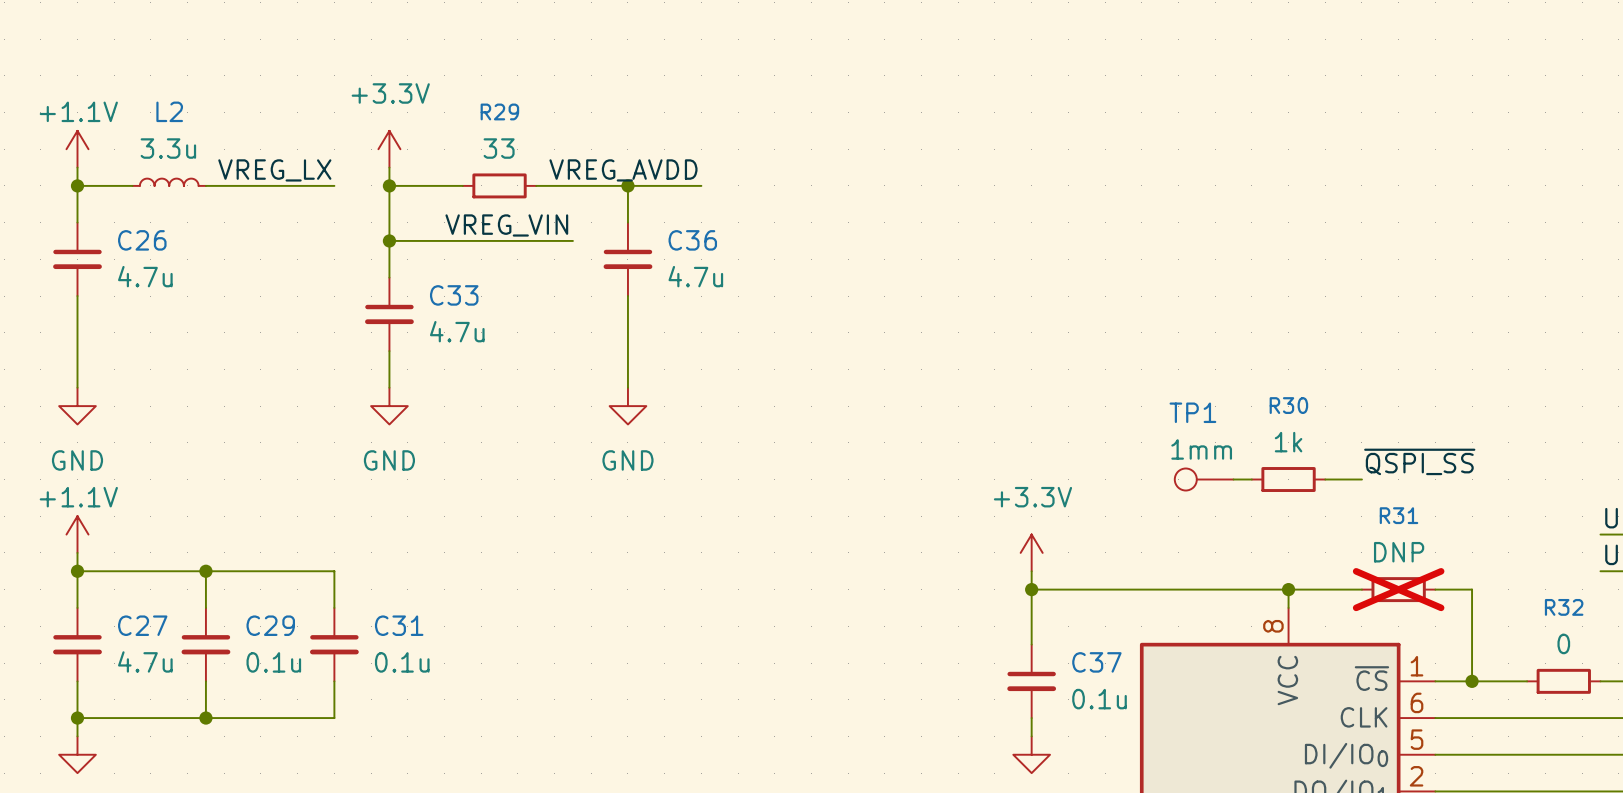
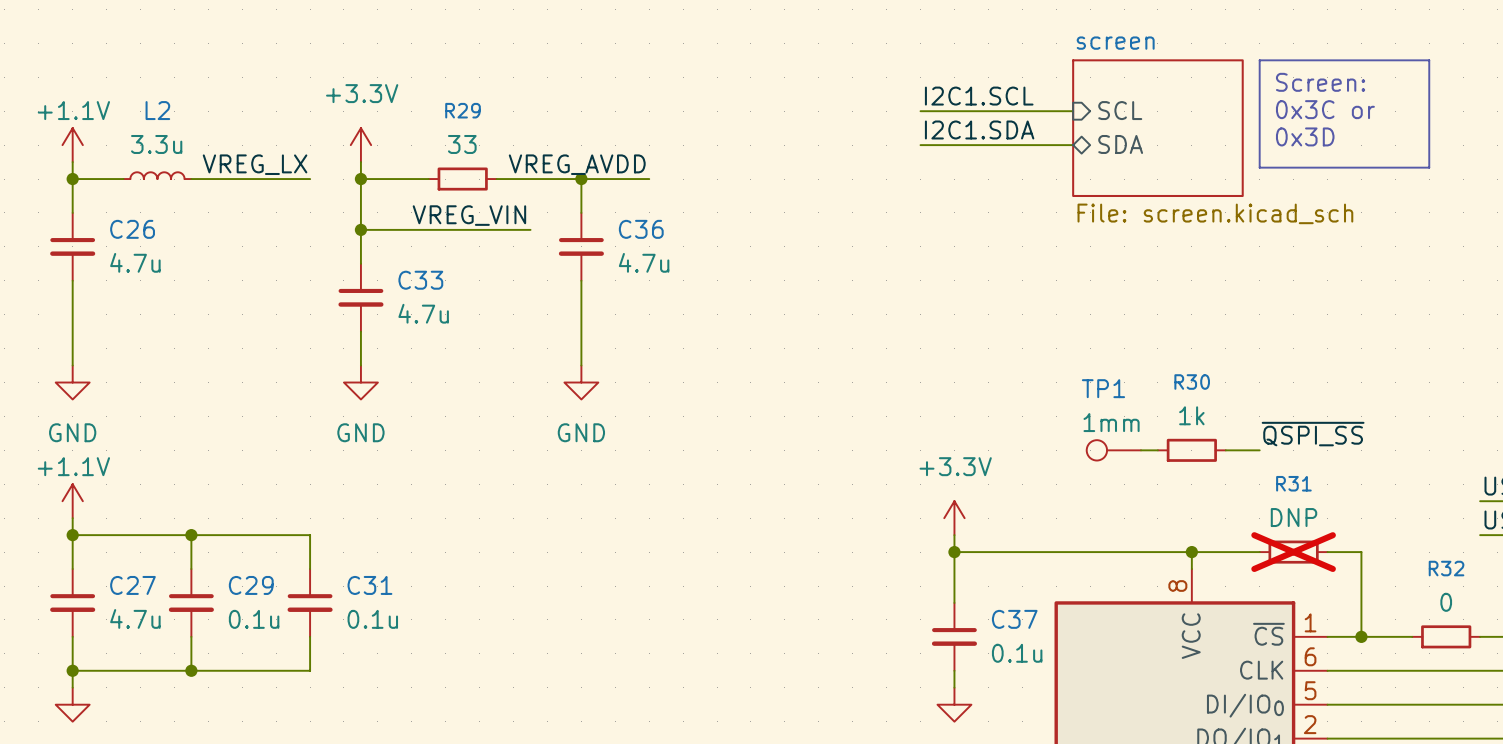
line: none -> (1259, 60) (1429, 60) (1429, 167) (1259, 167) (1259, 60)
text: none -> Screen: (1320, 82)
label: none -> I2C1.SCL (979, 96)
text: none -> 0x3C or (1325, 109)
sheet pin: none -> SCL (1120, 110)
wire: none -> (920, 111) (1073, 111)
sheet screen: none -> File: screen.kicad_sch (1157, 128)
label: none -> I2C1.SDA (979, 129)
text: none -> 0x3D (1305, 136)
sheet pin: none -> SDA (1120, 144)
wire: none -> (920, 145) (1073, 145)

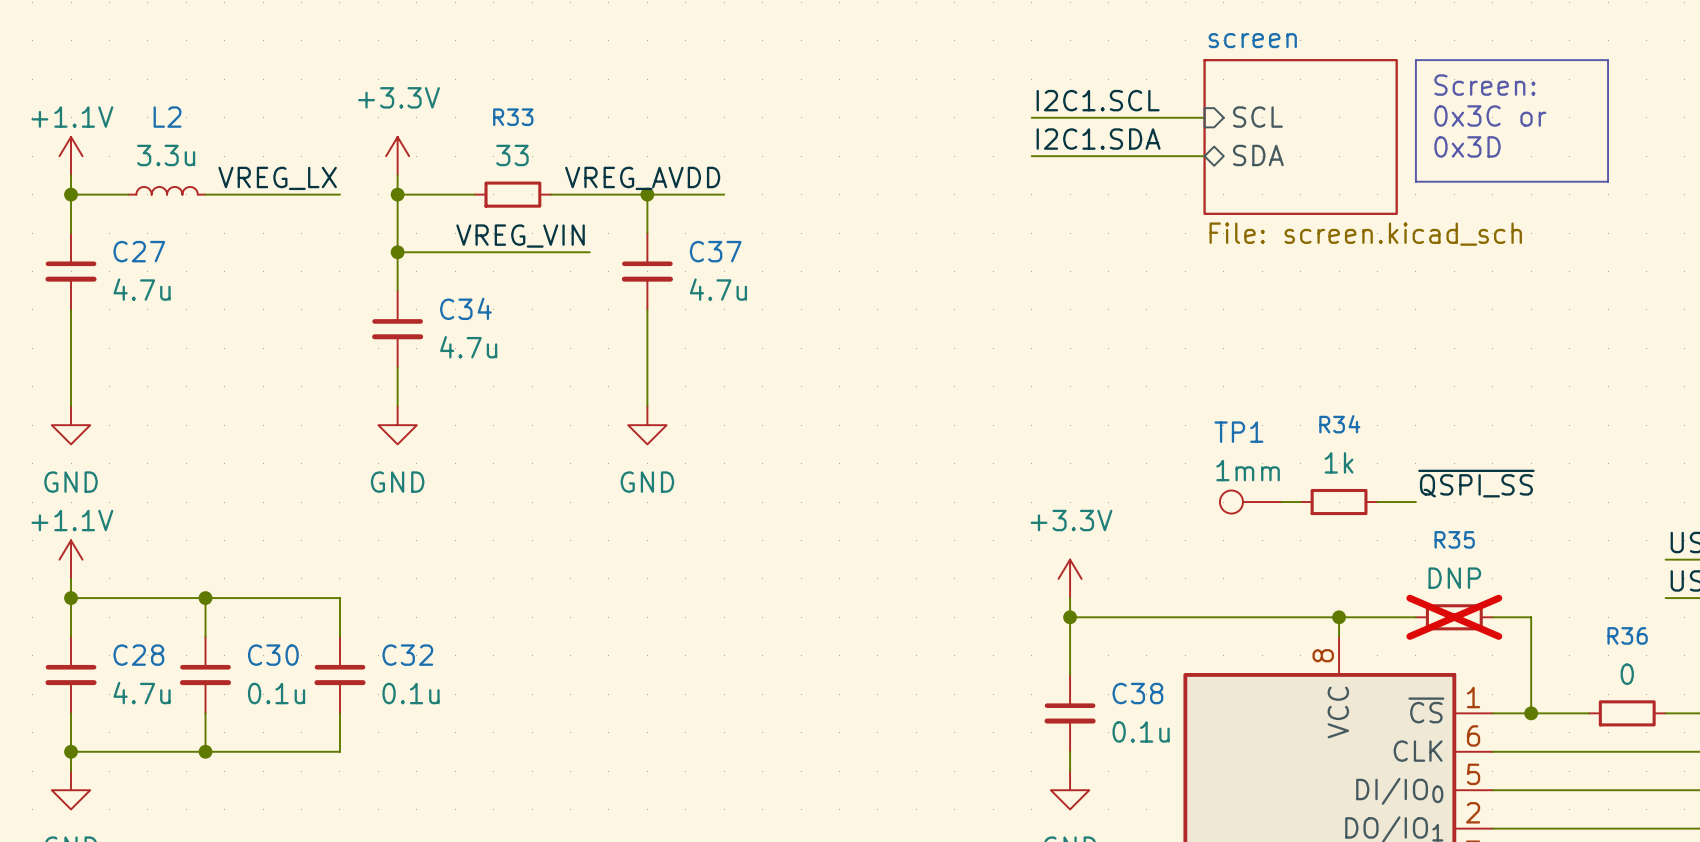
R29 name: R29 (463, 110) -> R33 (513, 117)
C26 name: C26 (132, 229) -> C27 (139, 251)
C36 name: C36 (641, 229) -> C37 (715, 251)
C33 name: C33 (420, 280) -> C34 (465, 308)
R30 name: R30 (1192, 382) -> R34 (1339, 424)
R31 name: R31 (1293, 483) -> R35 (1454, 539)
R32 name: R32 (1446, 568) -> R36 (1627, 635)
C27 name: C27 (132, 585) -> C28 (138, 655)
C29 name: C29 (251, 585) -> C30 (273, 655)
C31 name: C31 (369, 585) -> C32 (407, 655)
C37 name: C37 (1014, 619) -> C38 (1137, 693)

